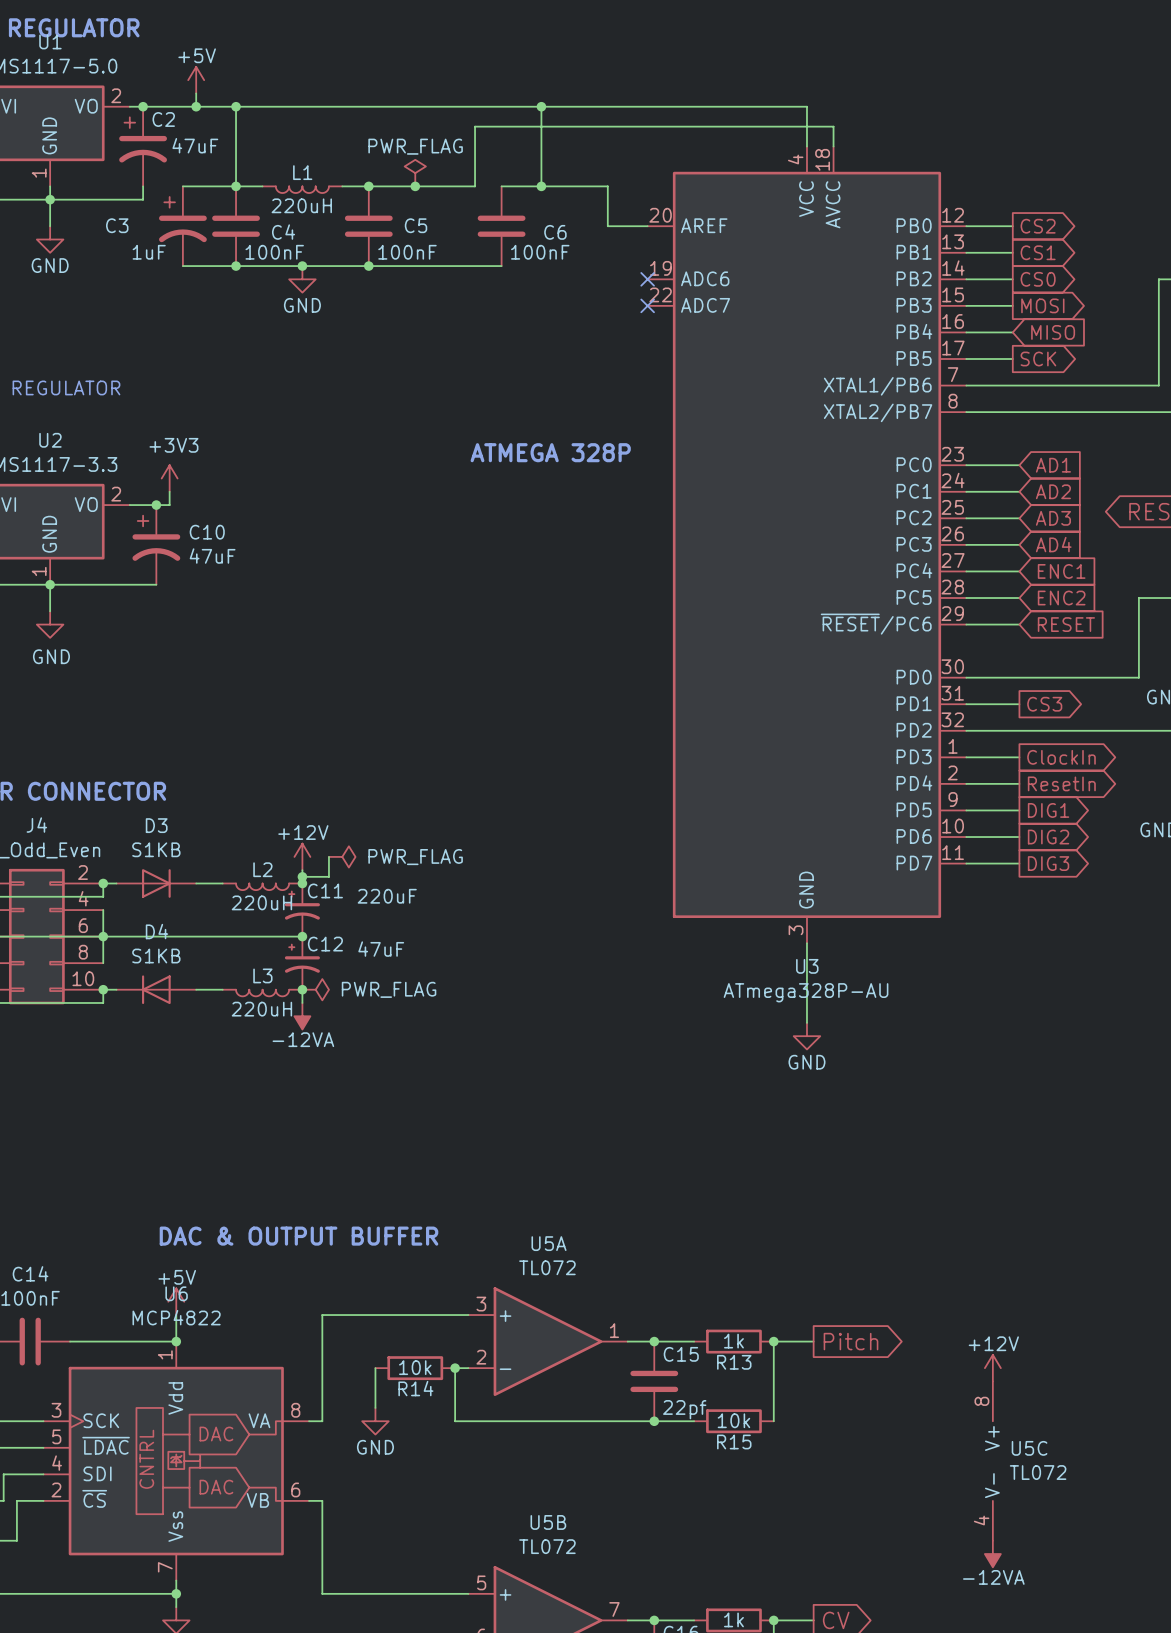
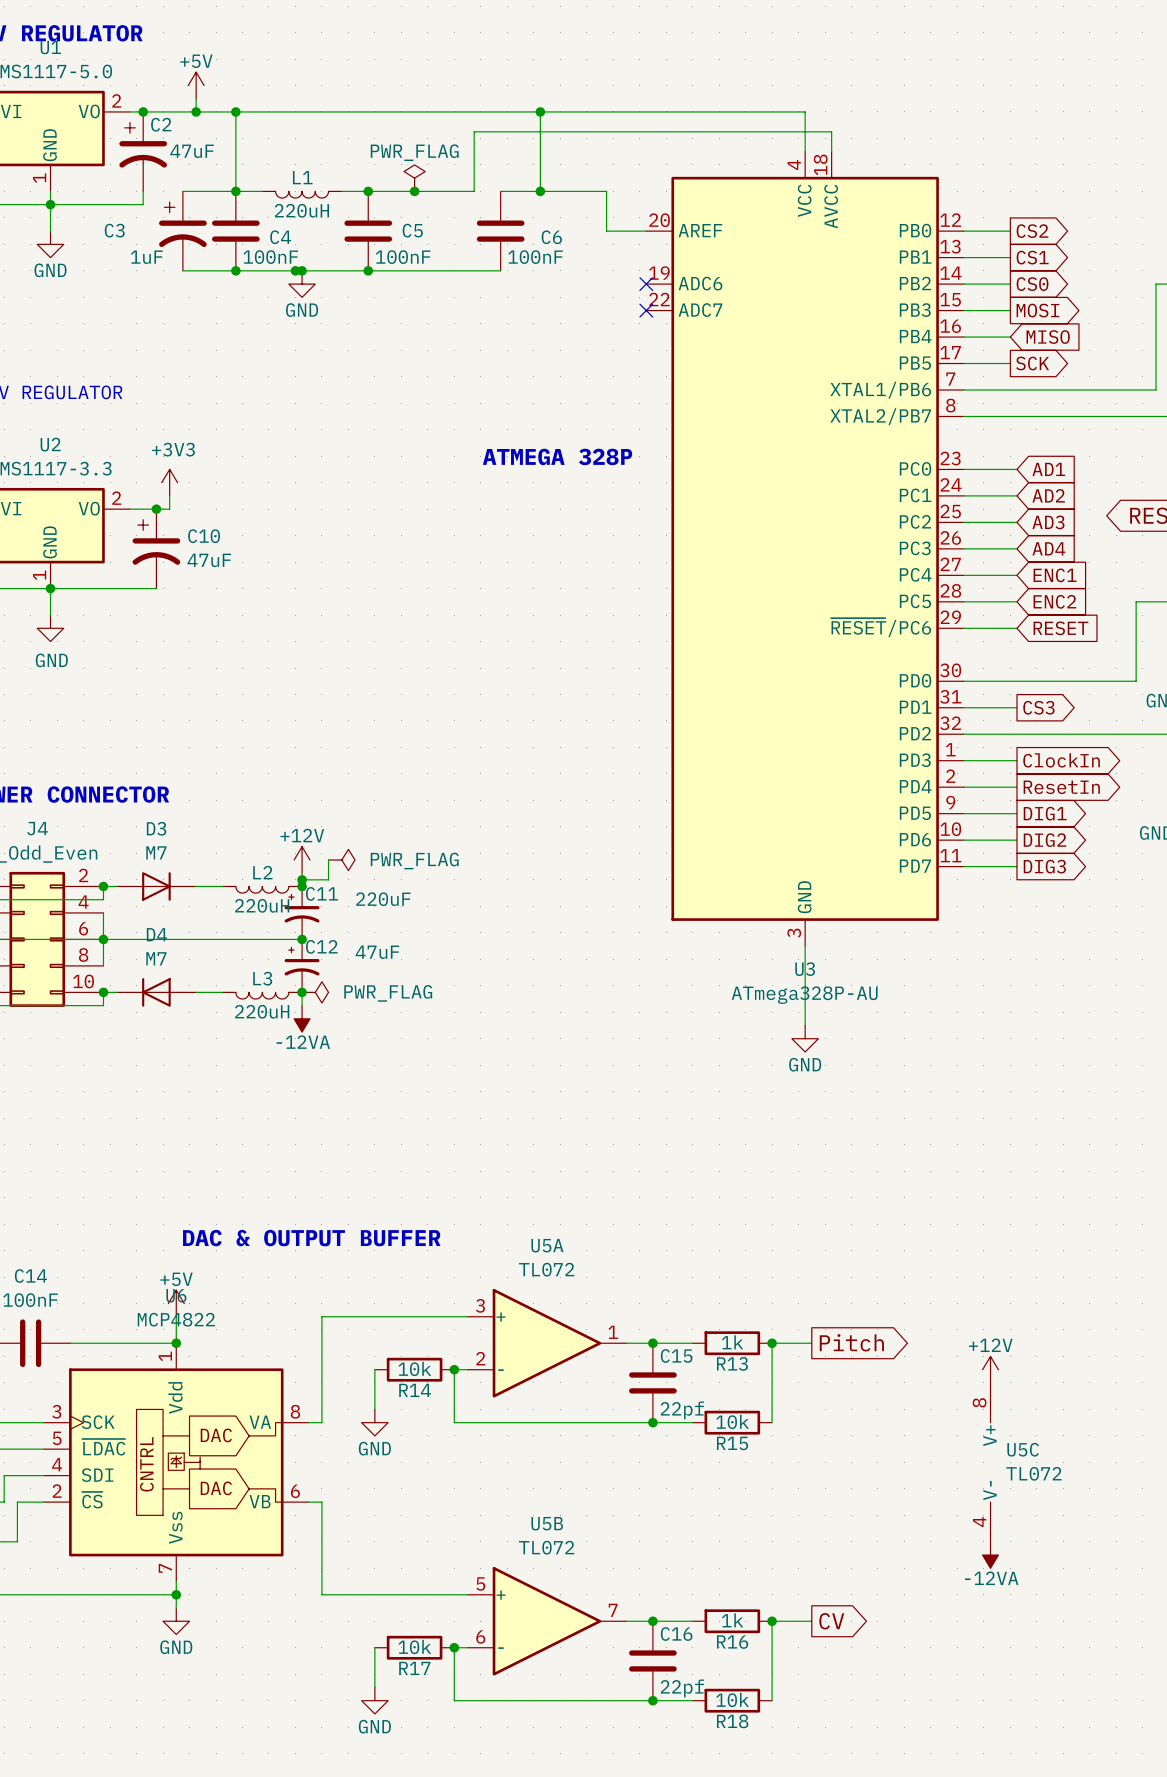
junction: none -> (295, 270)
D3 value: S1KB (156, 849) -> M7 (156, 852)
D4 value: S1KB (156, 956) -> M7 (156, 958)

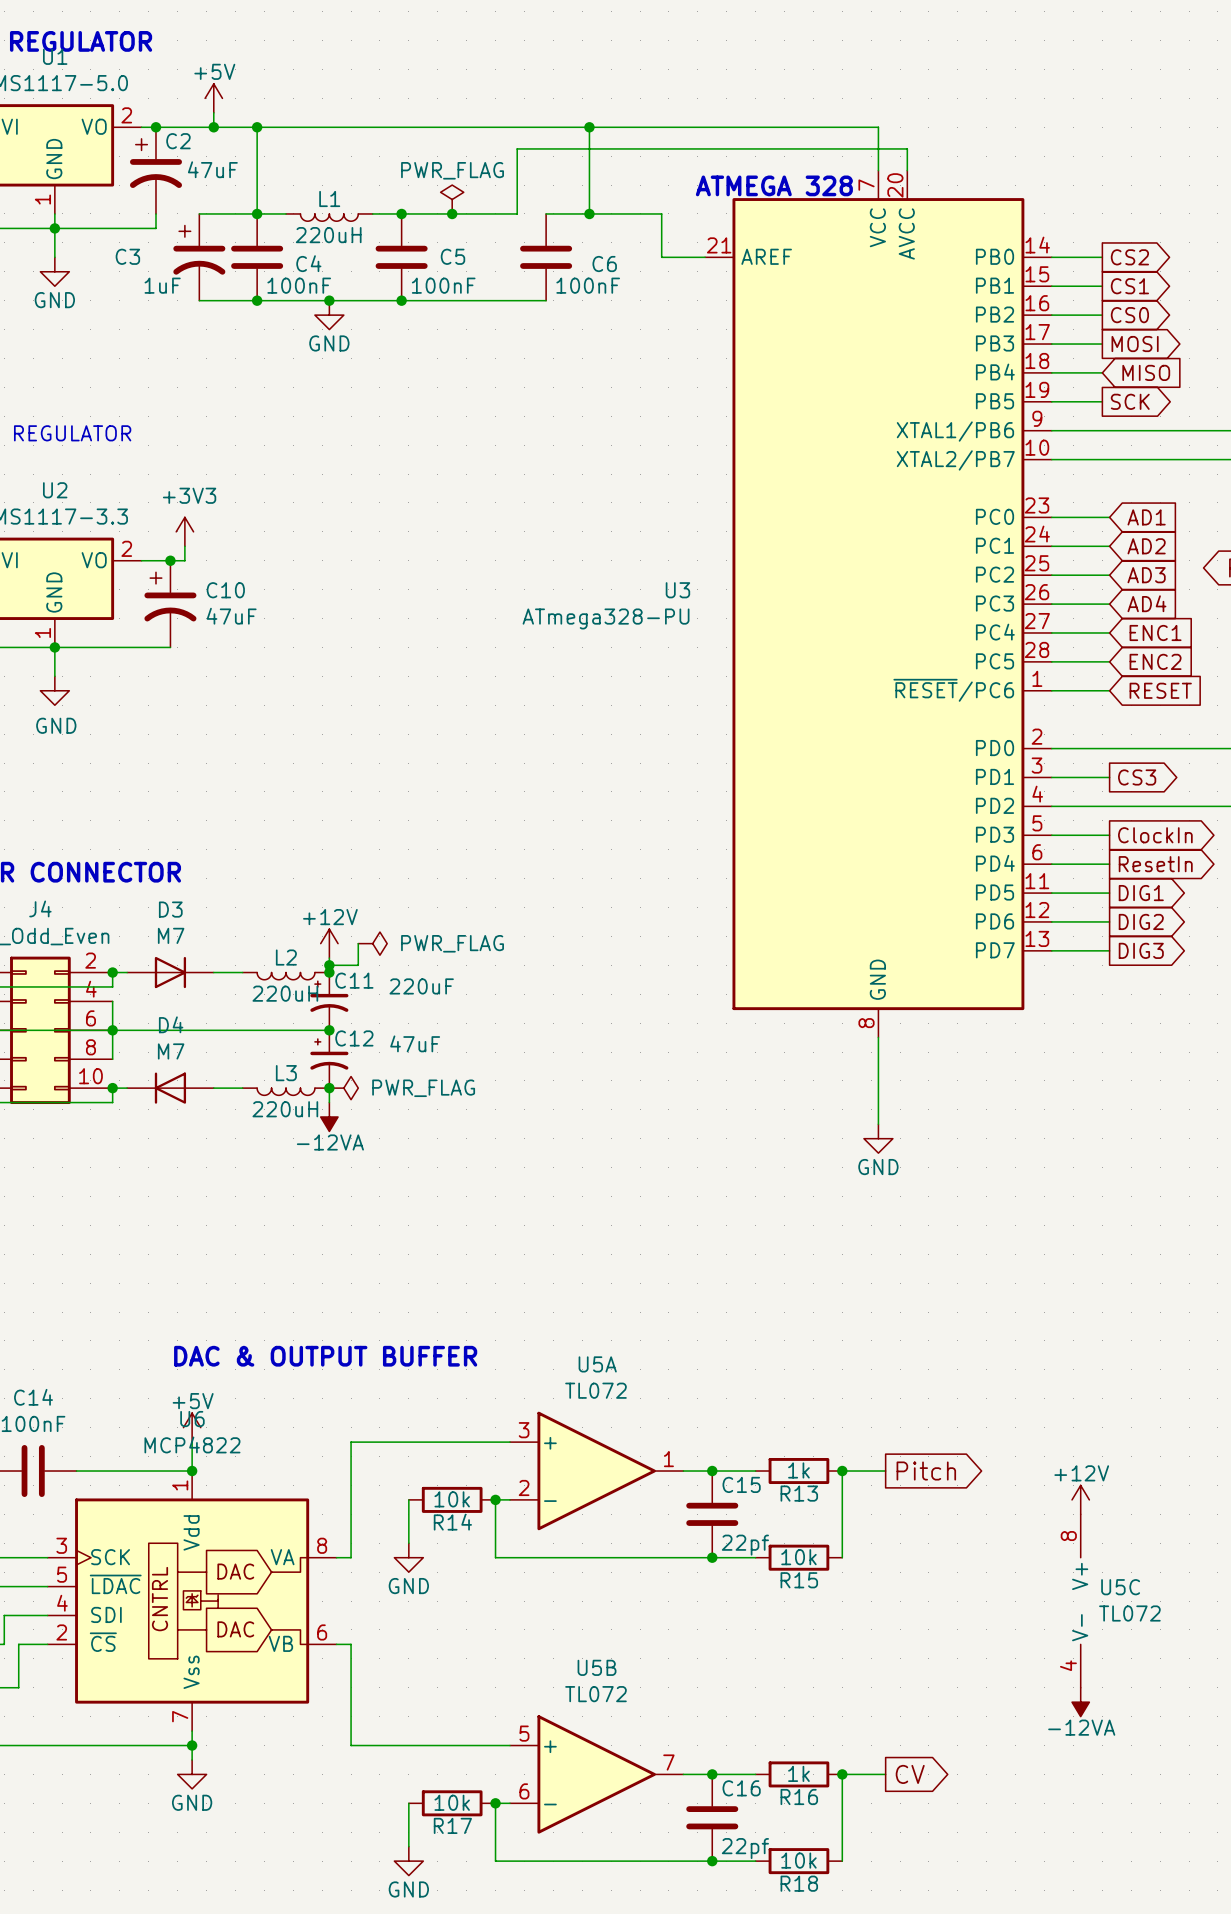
U3 symbol: [646, 151, 965, 947] -> [705, 170, 1052, 1038]
text: none -> ATMEGA 328 (774, 185)
junction: (295, 270) -> none
no-connect mark: (646, 284) -> none
no-connect mark: (646, 310) -> none
text: ATMEGA 328P (557, 456) -> none
U3 name position: U3 (805, 969) -> U3 (677, 590)
U3 value: ATmega328P-AU (804, 995) -> ATmega328-PU (606, 618)

